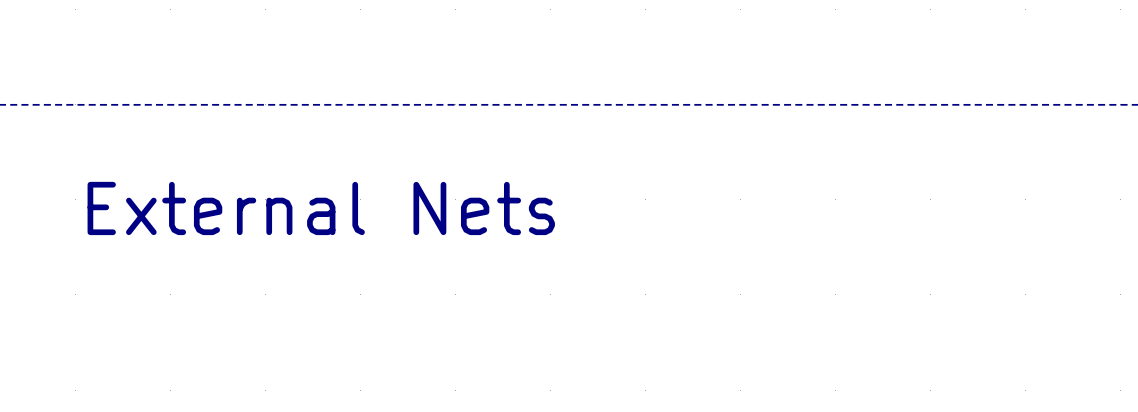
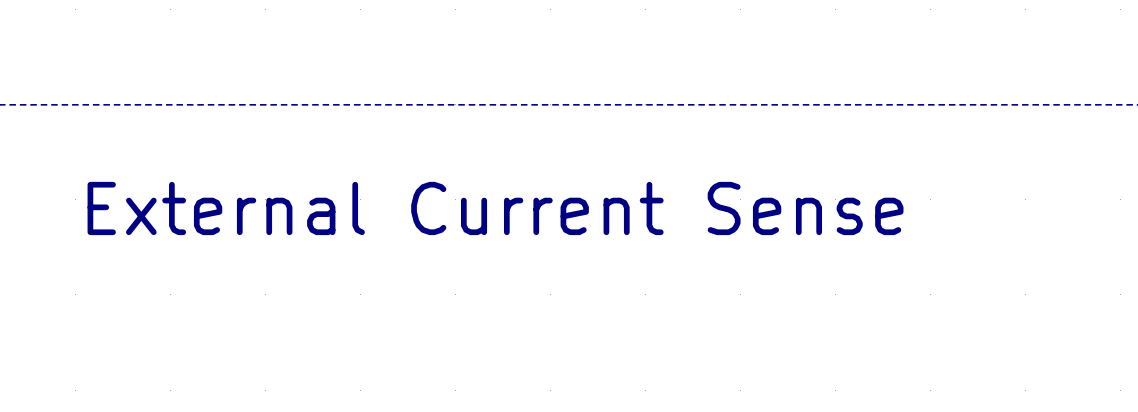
text: External Nets (321, 208) -> External Current Sense (495, 208)

